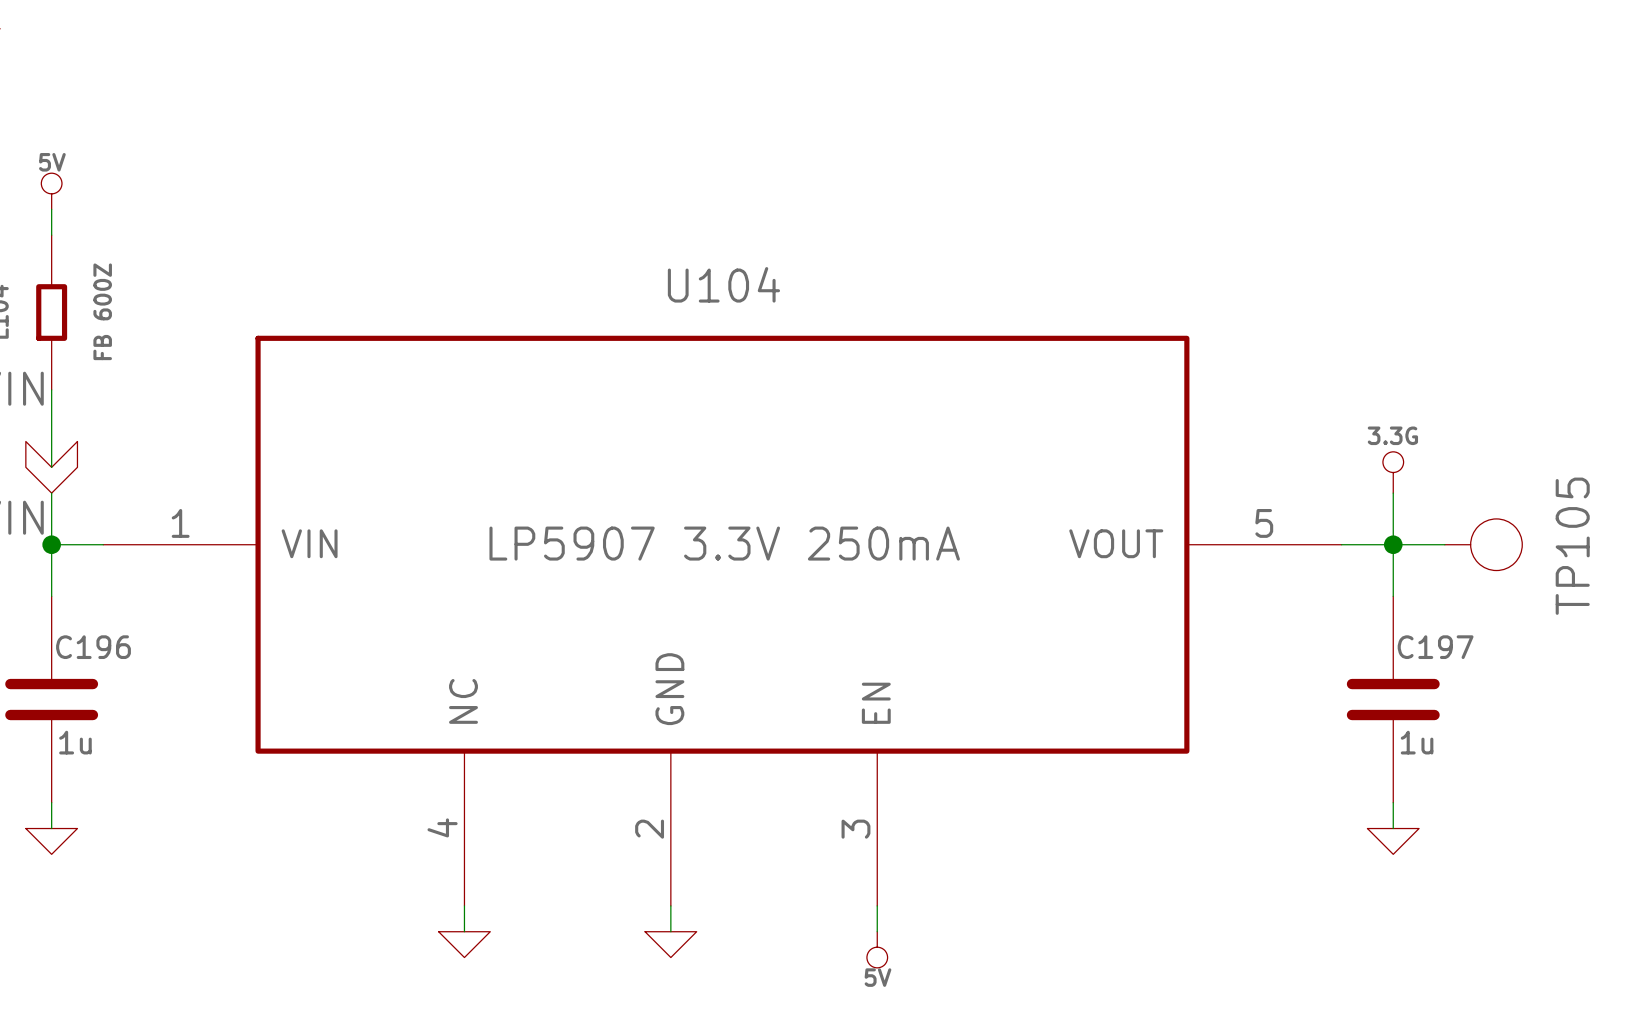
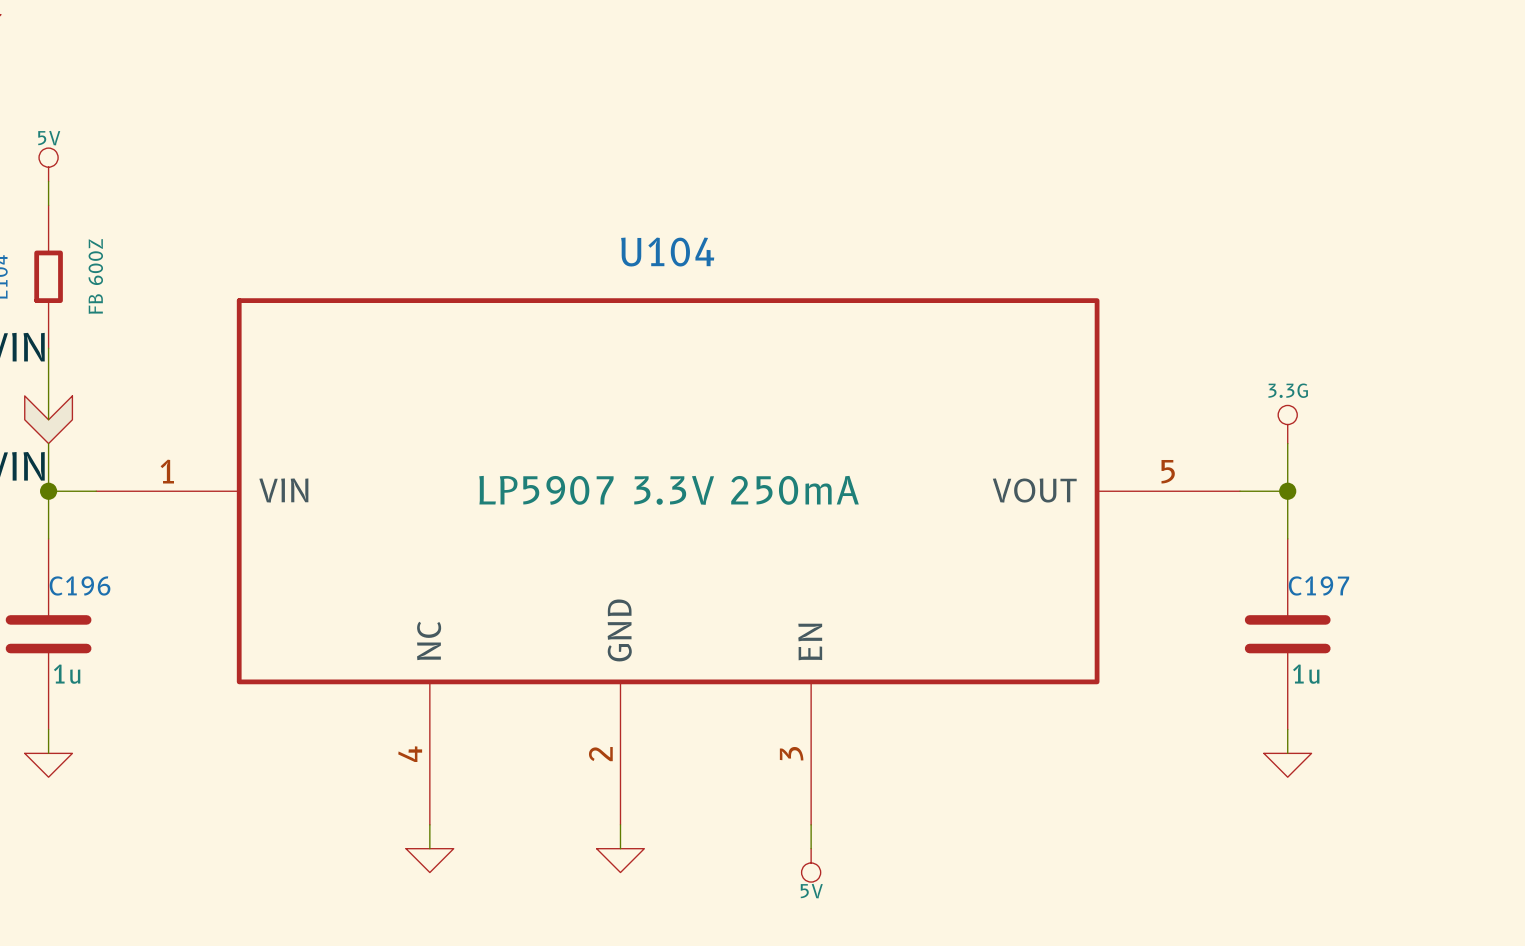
wire: (1393, 544) (1444, 544) -> none
TP105: (1483, 544) -> none

